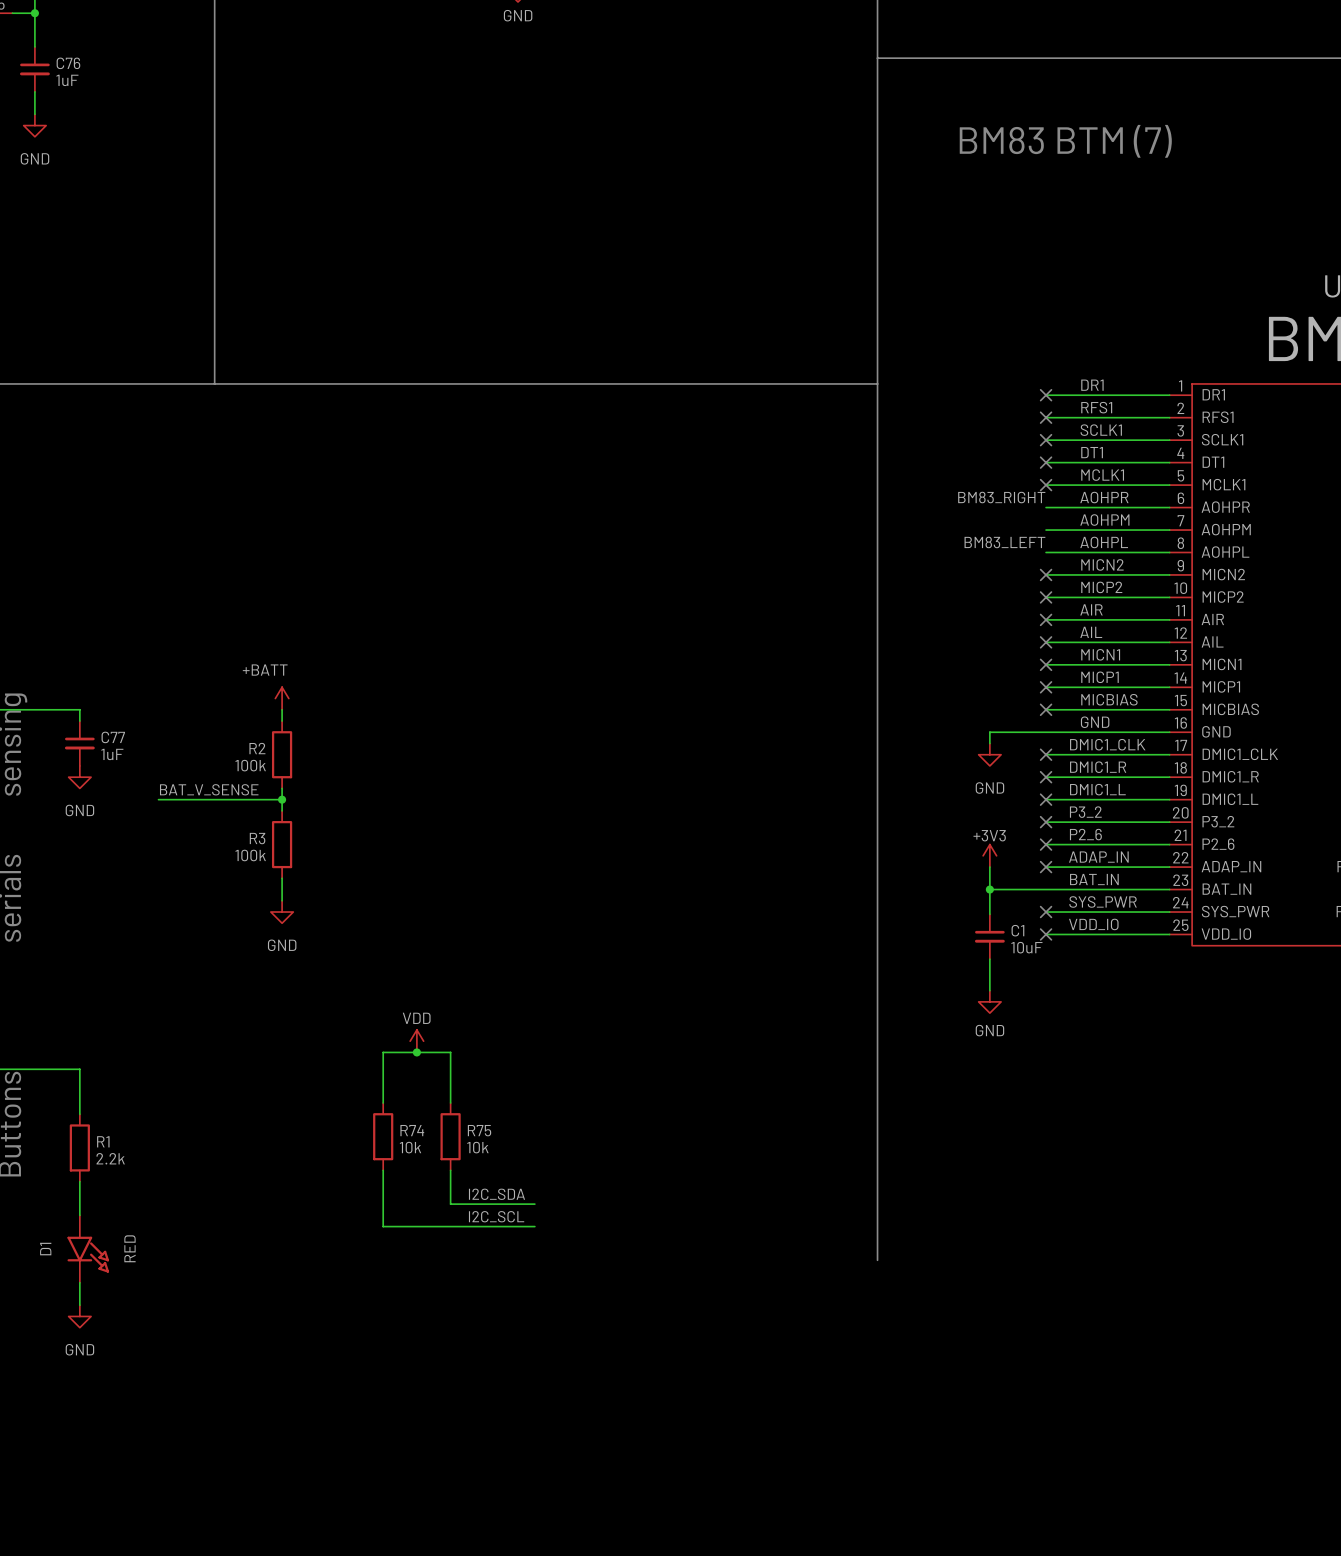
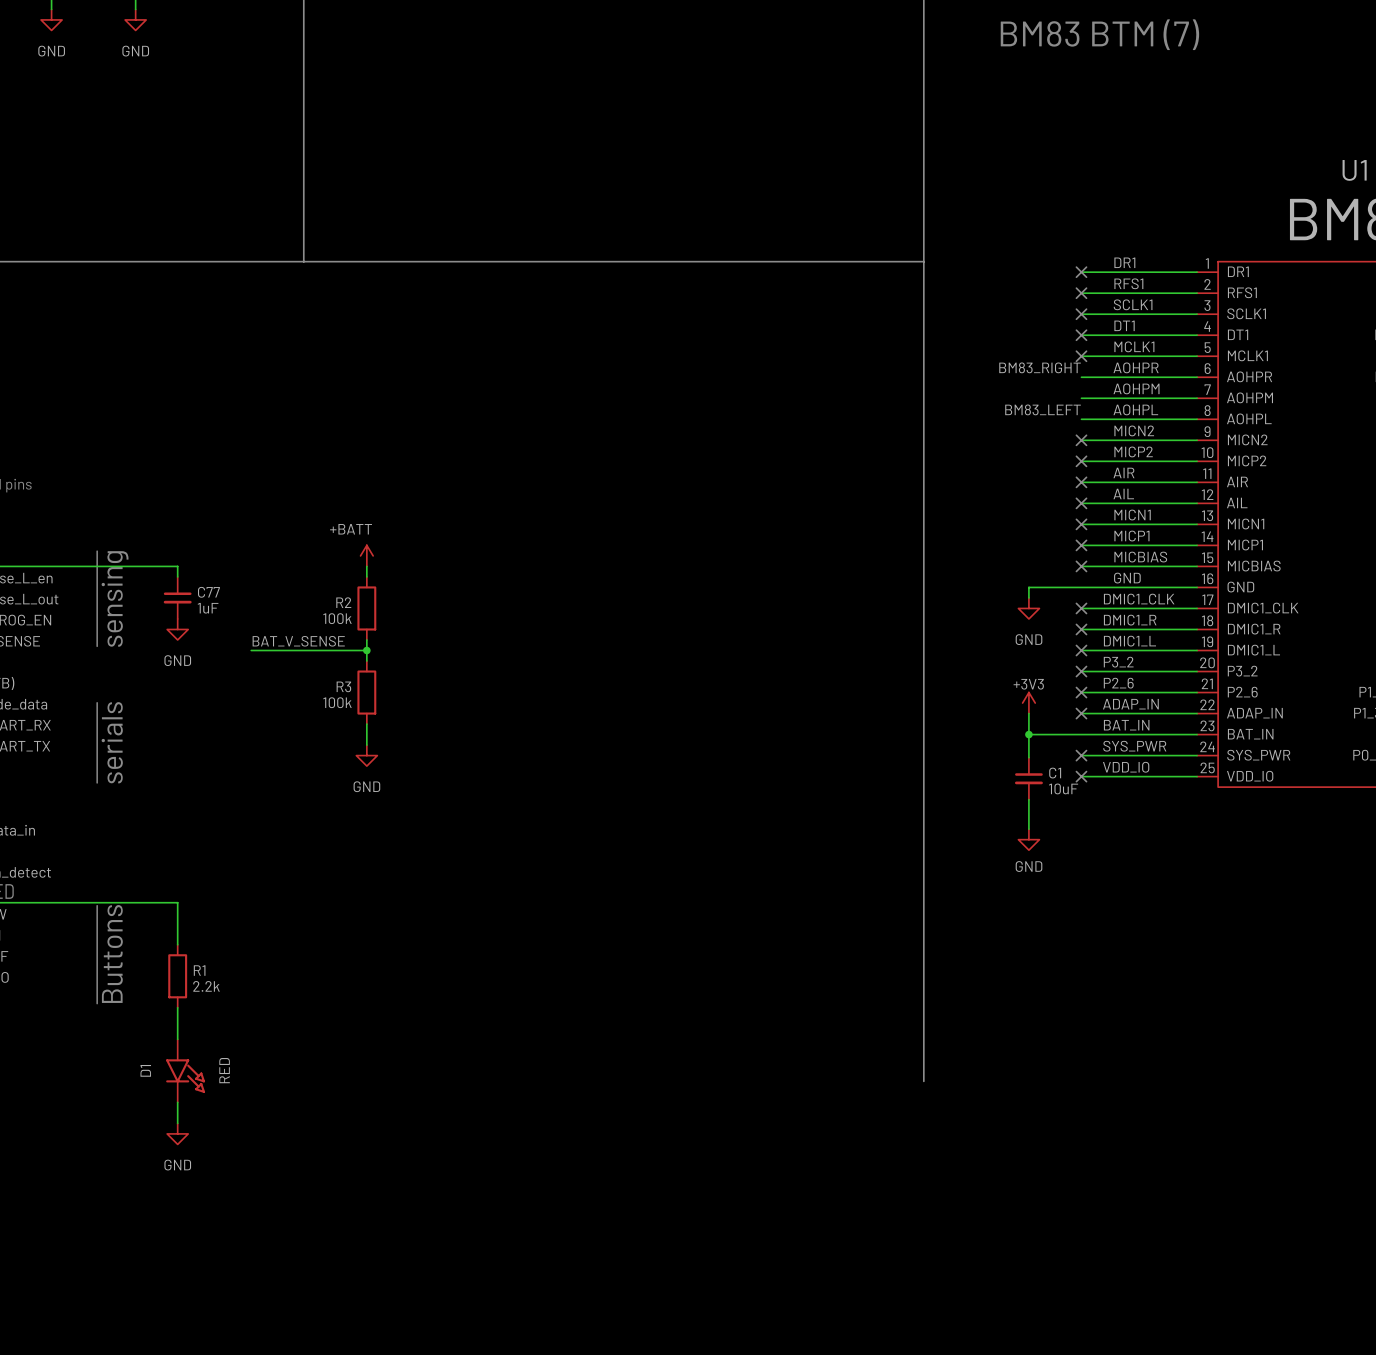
power symbol: VDD (416, 1041) -> none
junction: (416, 1052) -> none
wire: (383, 1103) (383, 1052) (450, 1052) (450, 1103) -> none
R74: 10k (383, 1136) -> none
R75: 10k (450, 1136) -> none
wire: (383, 1170) (383, 1226) (534, 1226) -> none
wire: (450, 1170) (450, 1204) (534, 1204) -> none
label: I2C_SDA (496, 1194) -> none
label: I2C_SCL (496, 1216) -> none

